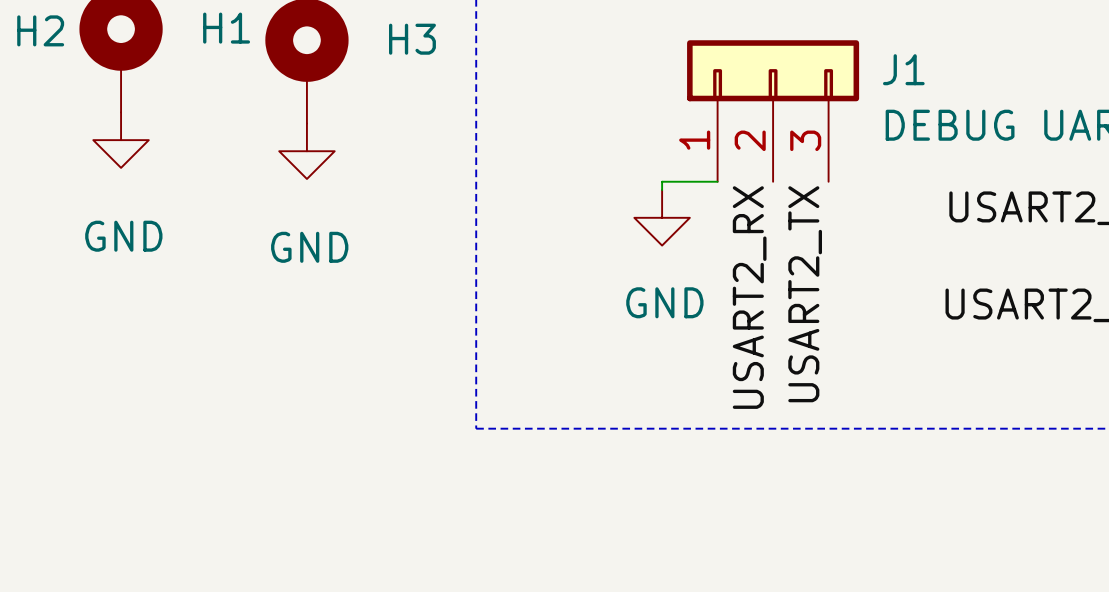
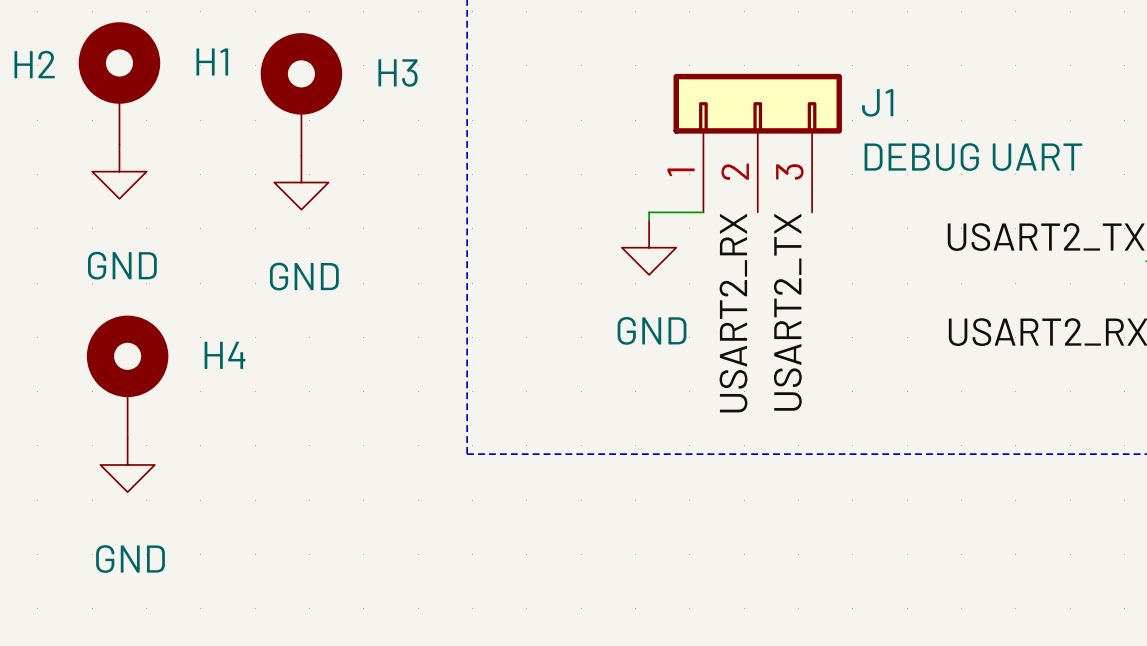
H4: none -> (127, 376)
power symbol: none -> GND (127, 464)

